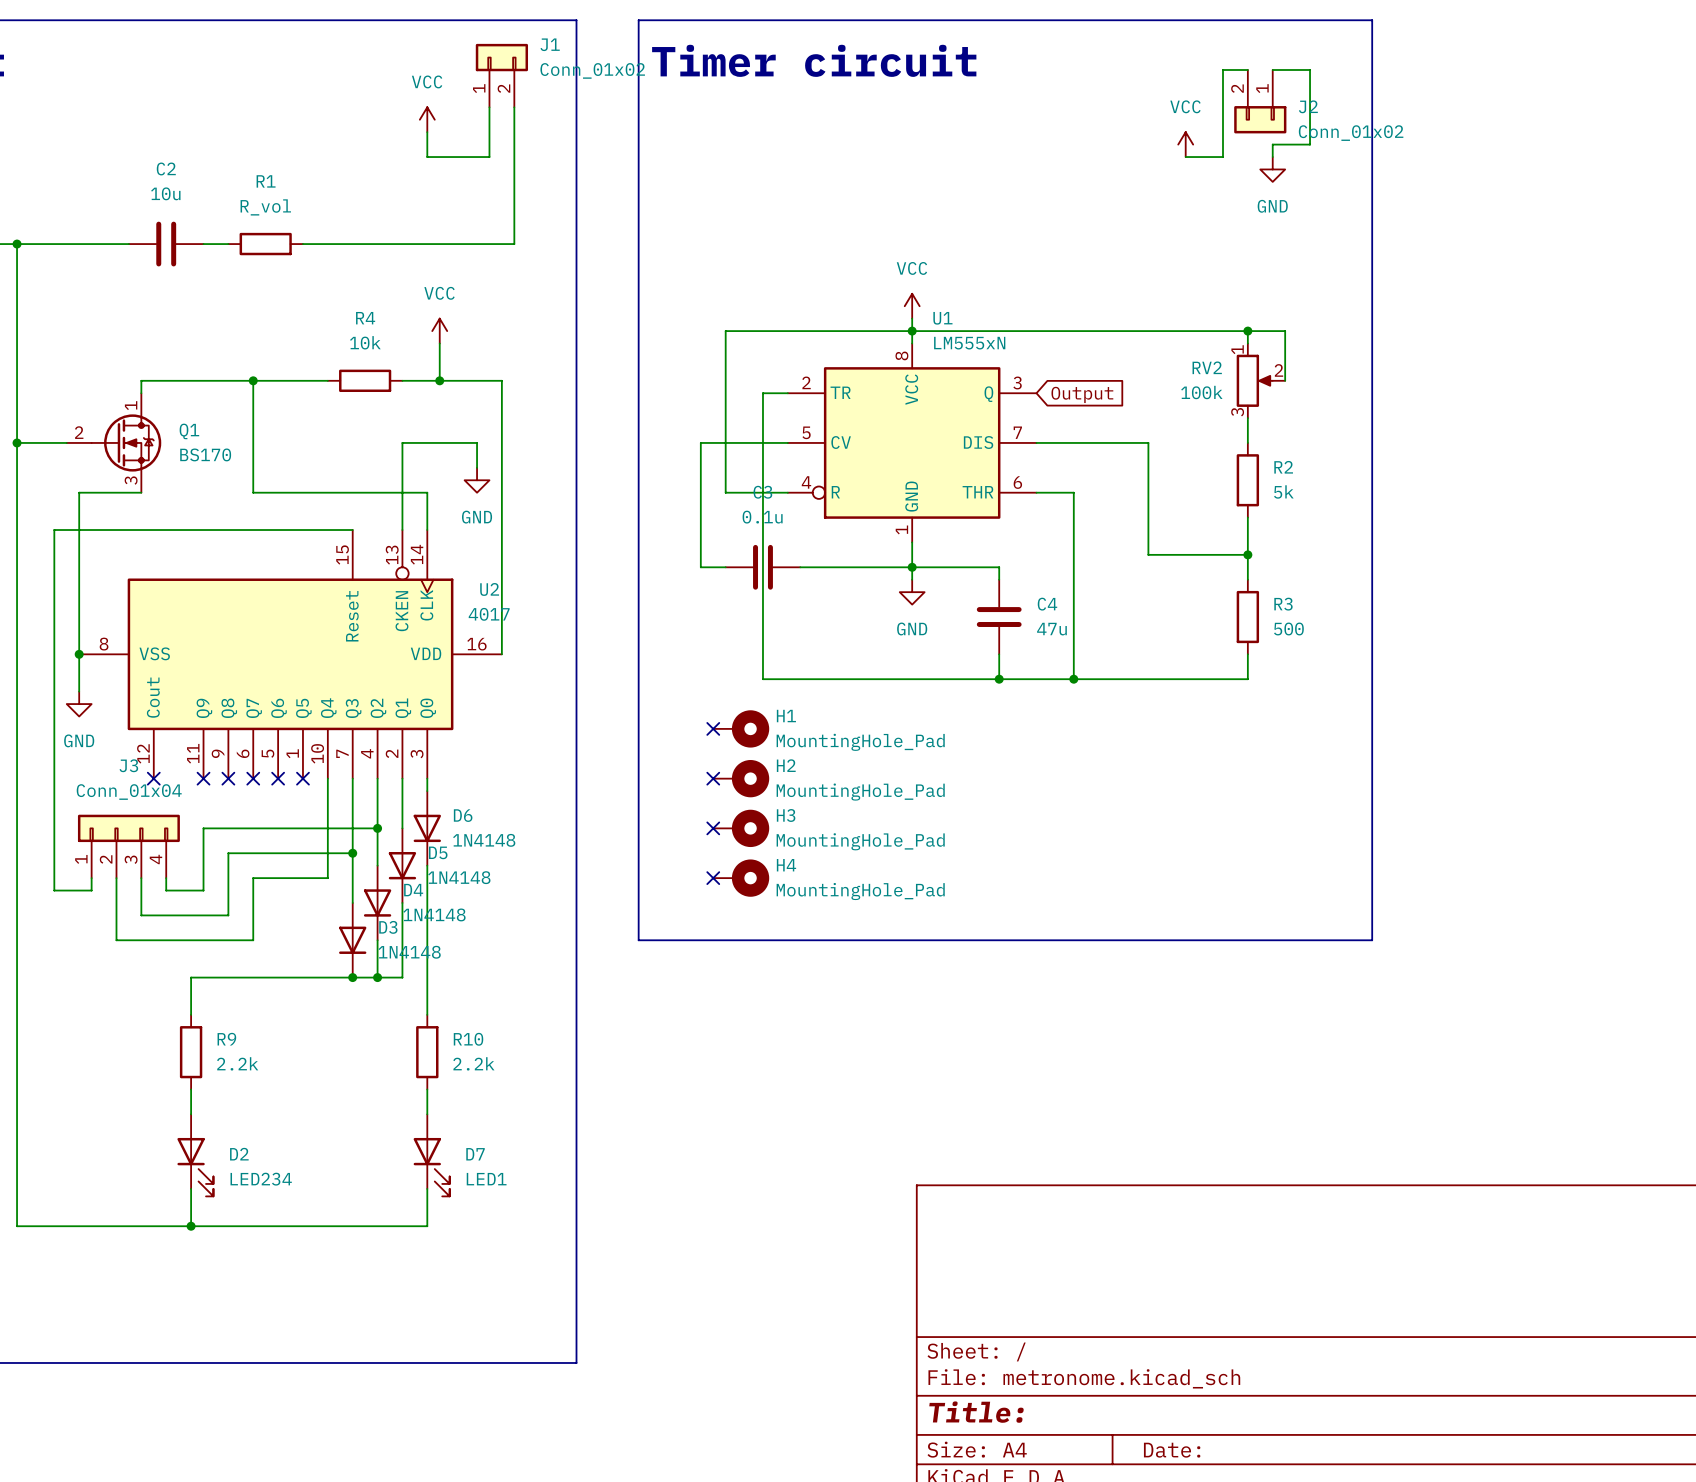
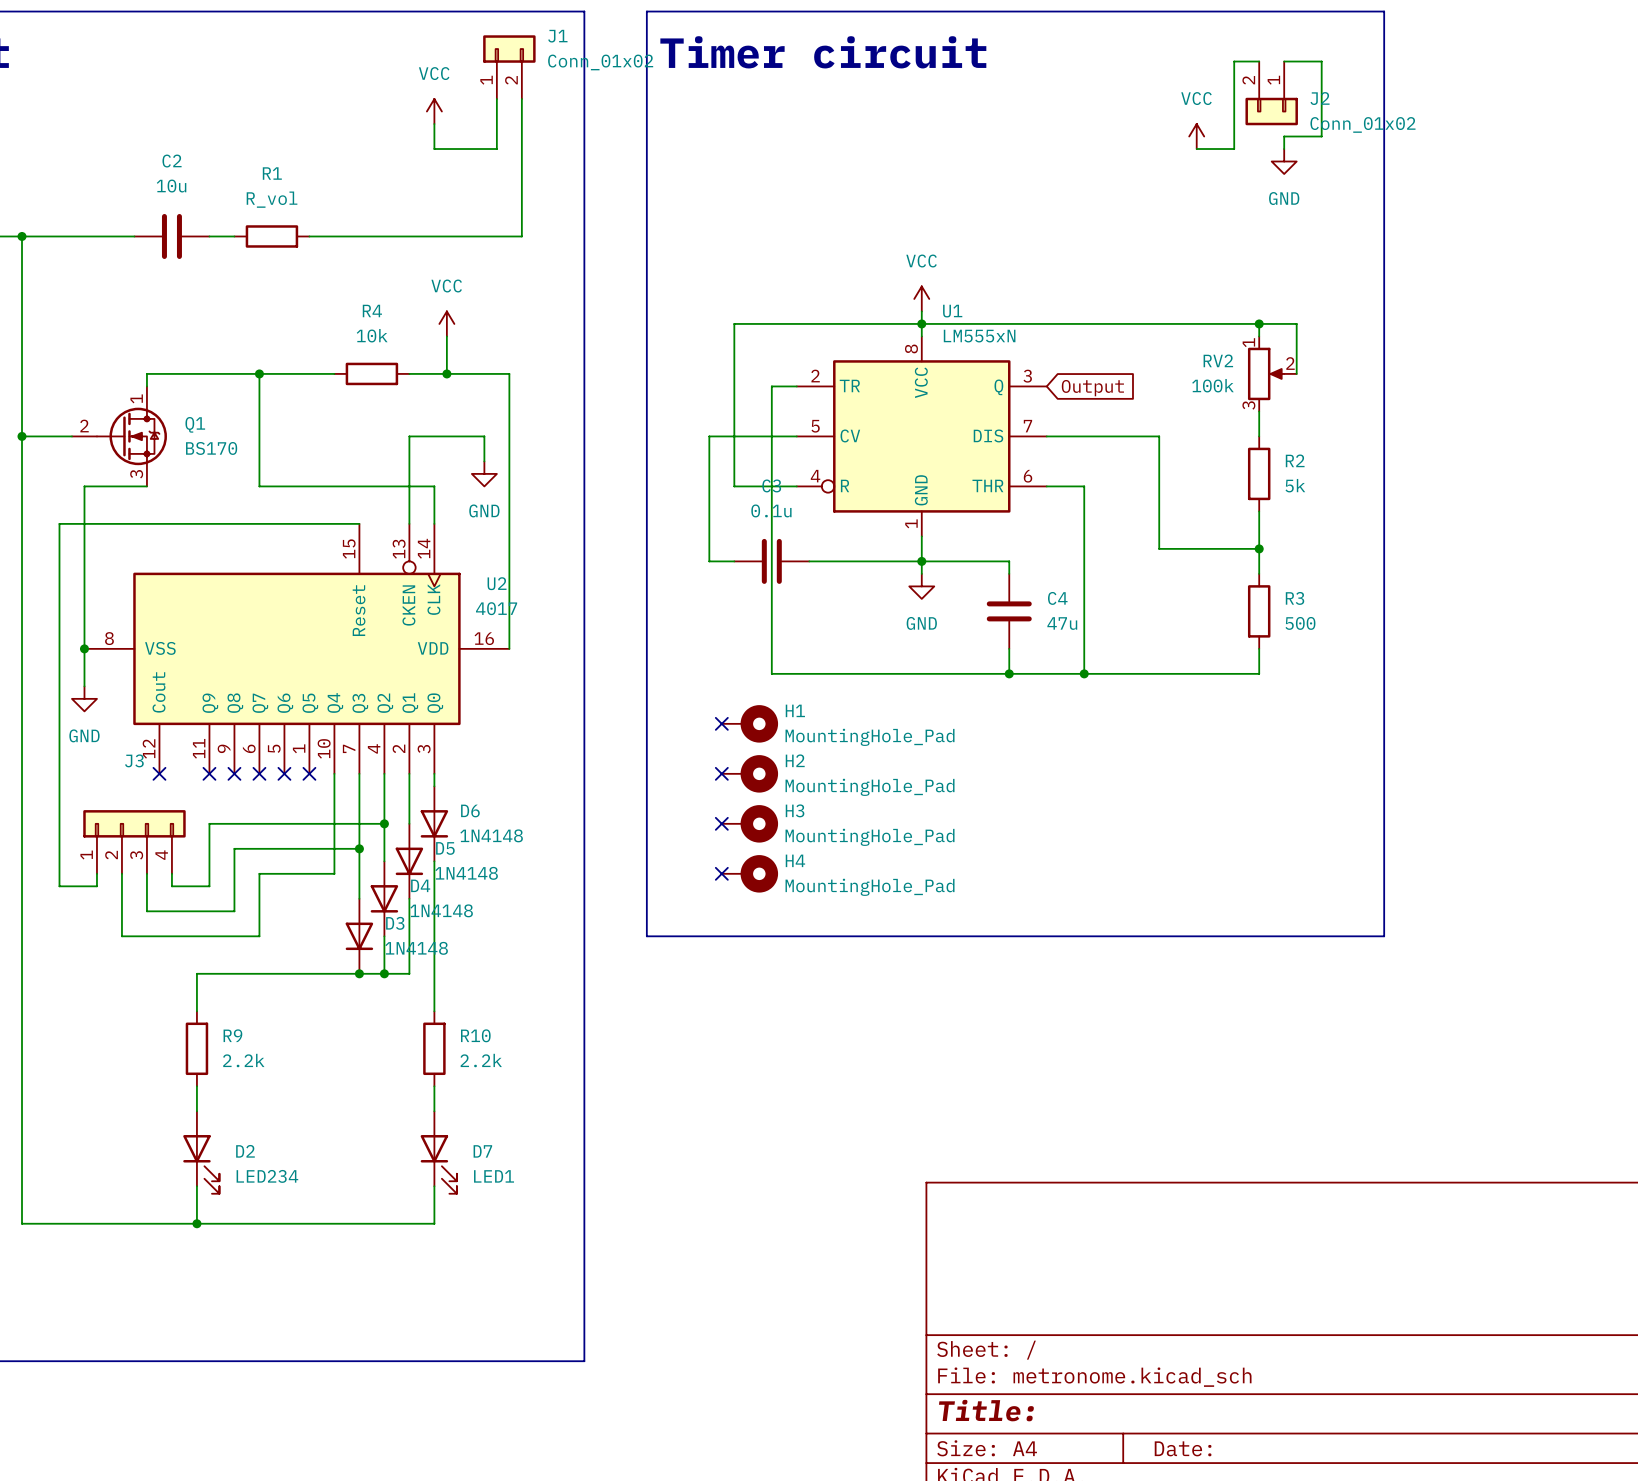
J3 value: Conn_01x04 (129, 792) -> none

